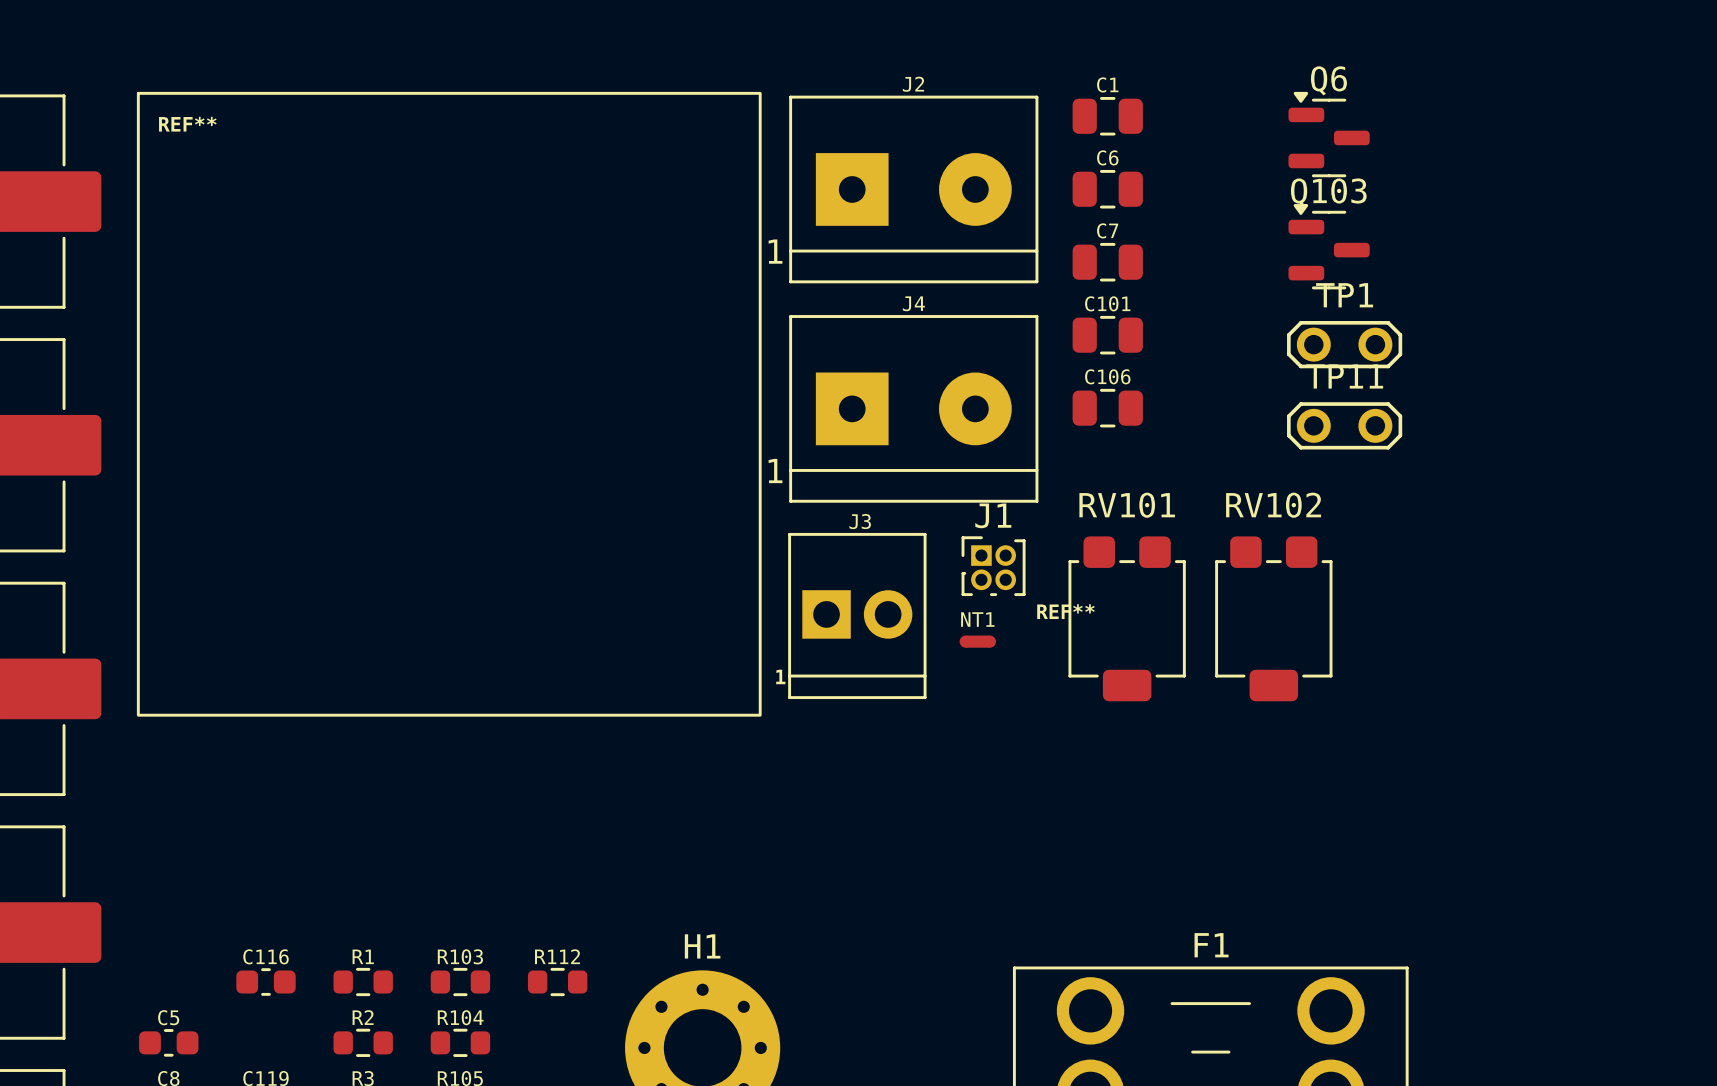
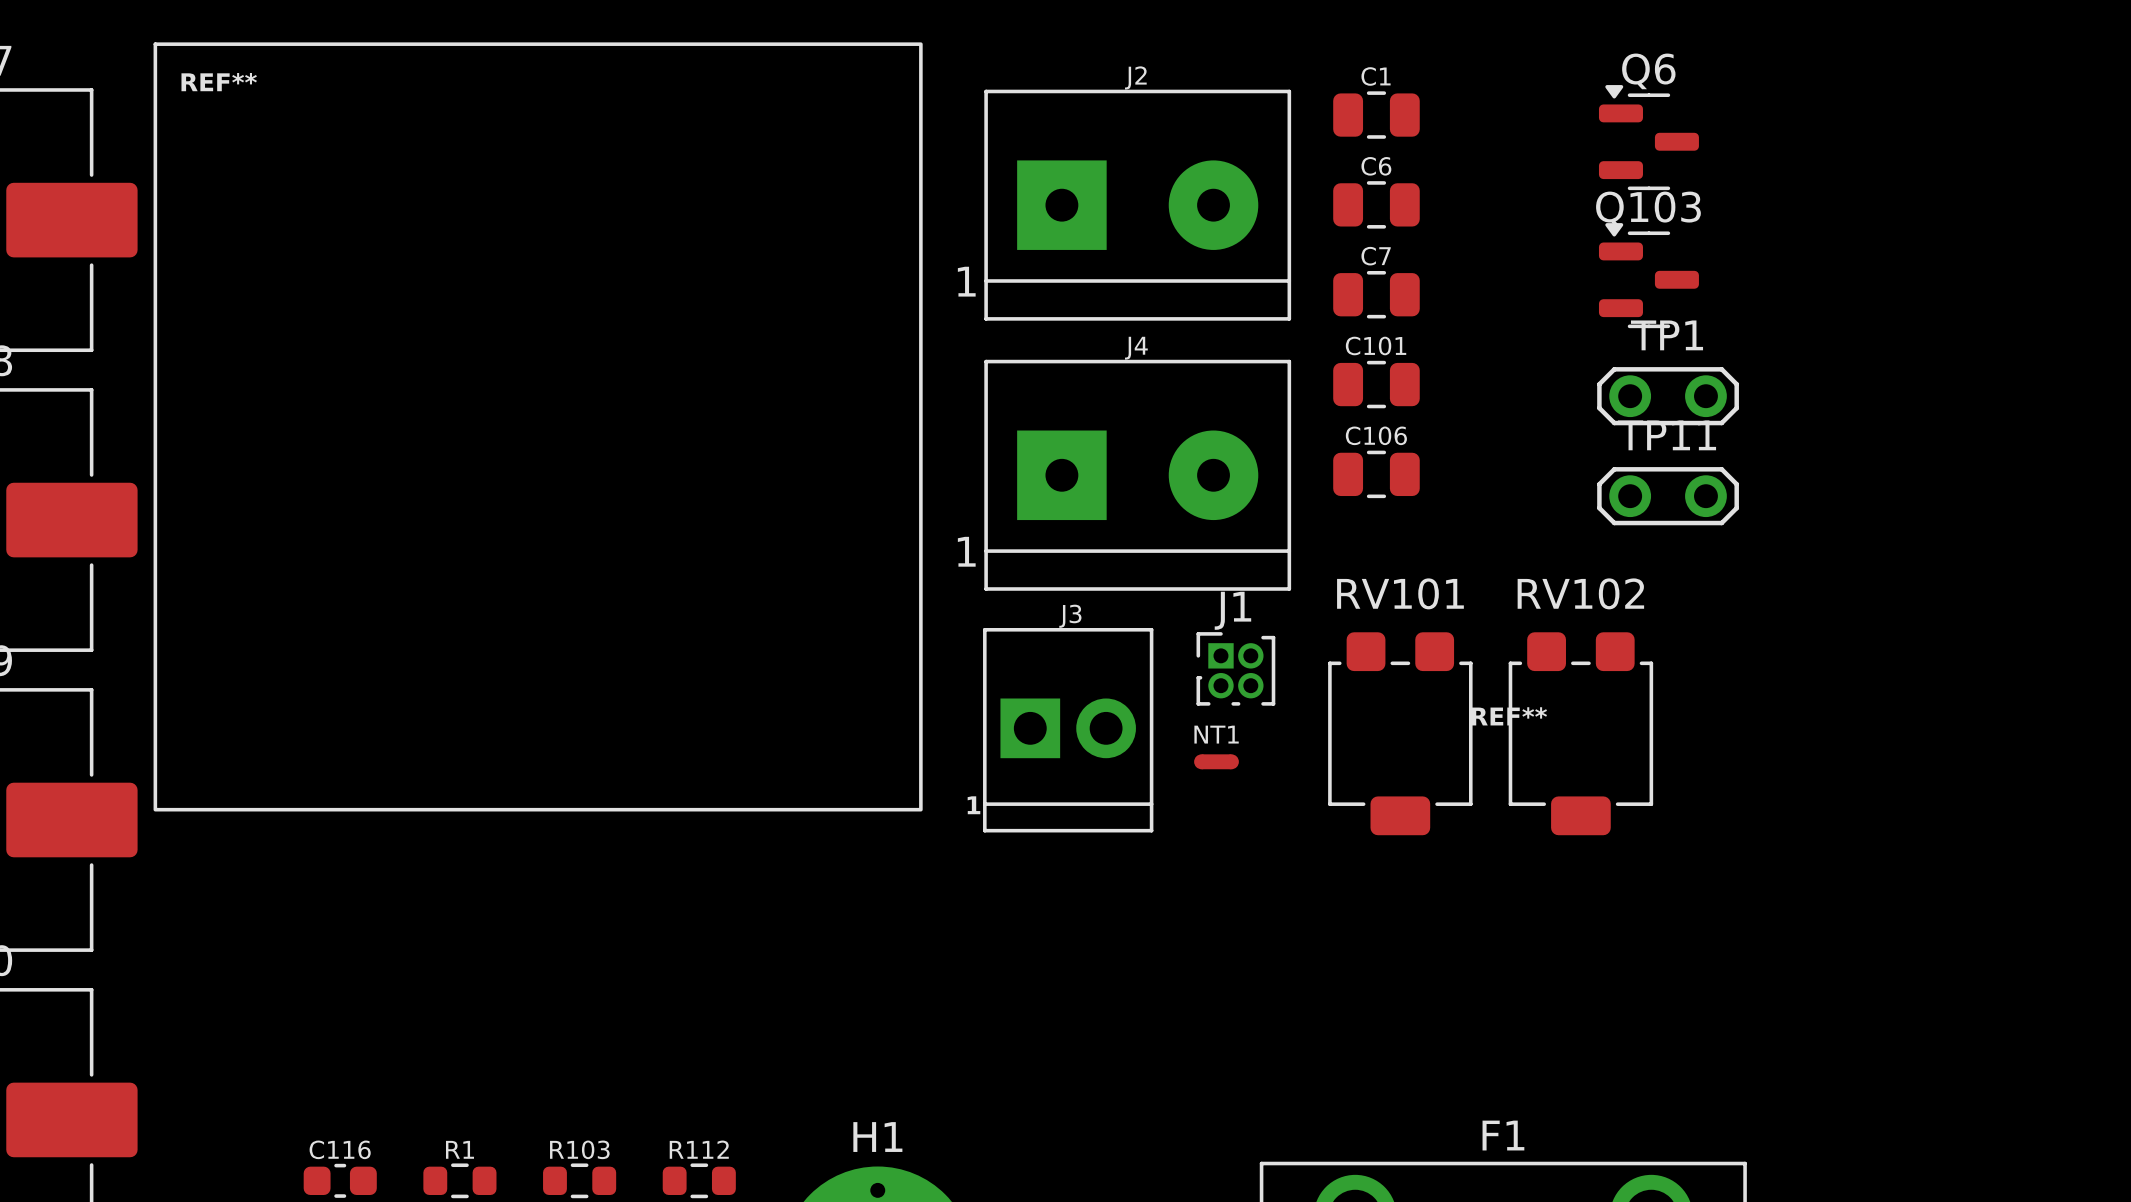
drawing position: (449, 404) -> (538, 426)
part position: (1065, 611) -> (1509, 716)

